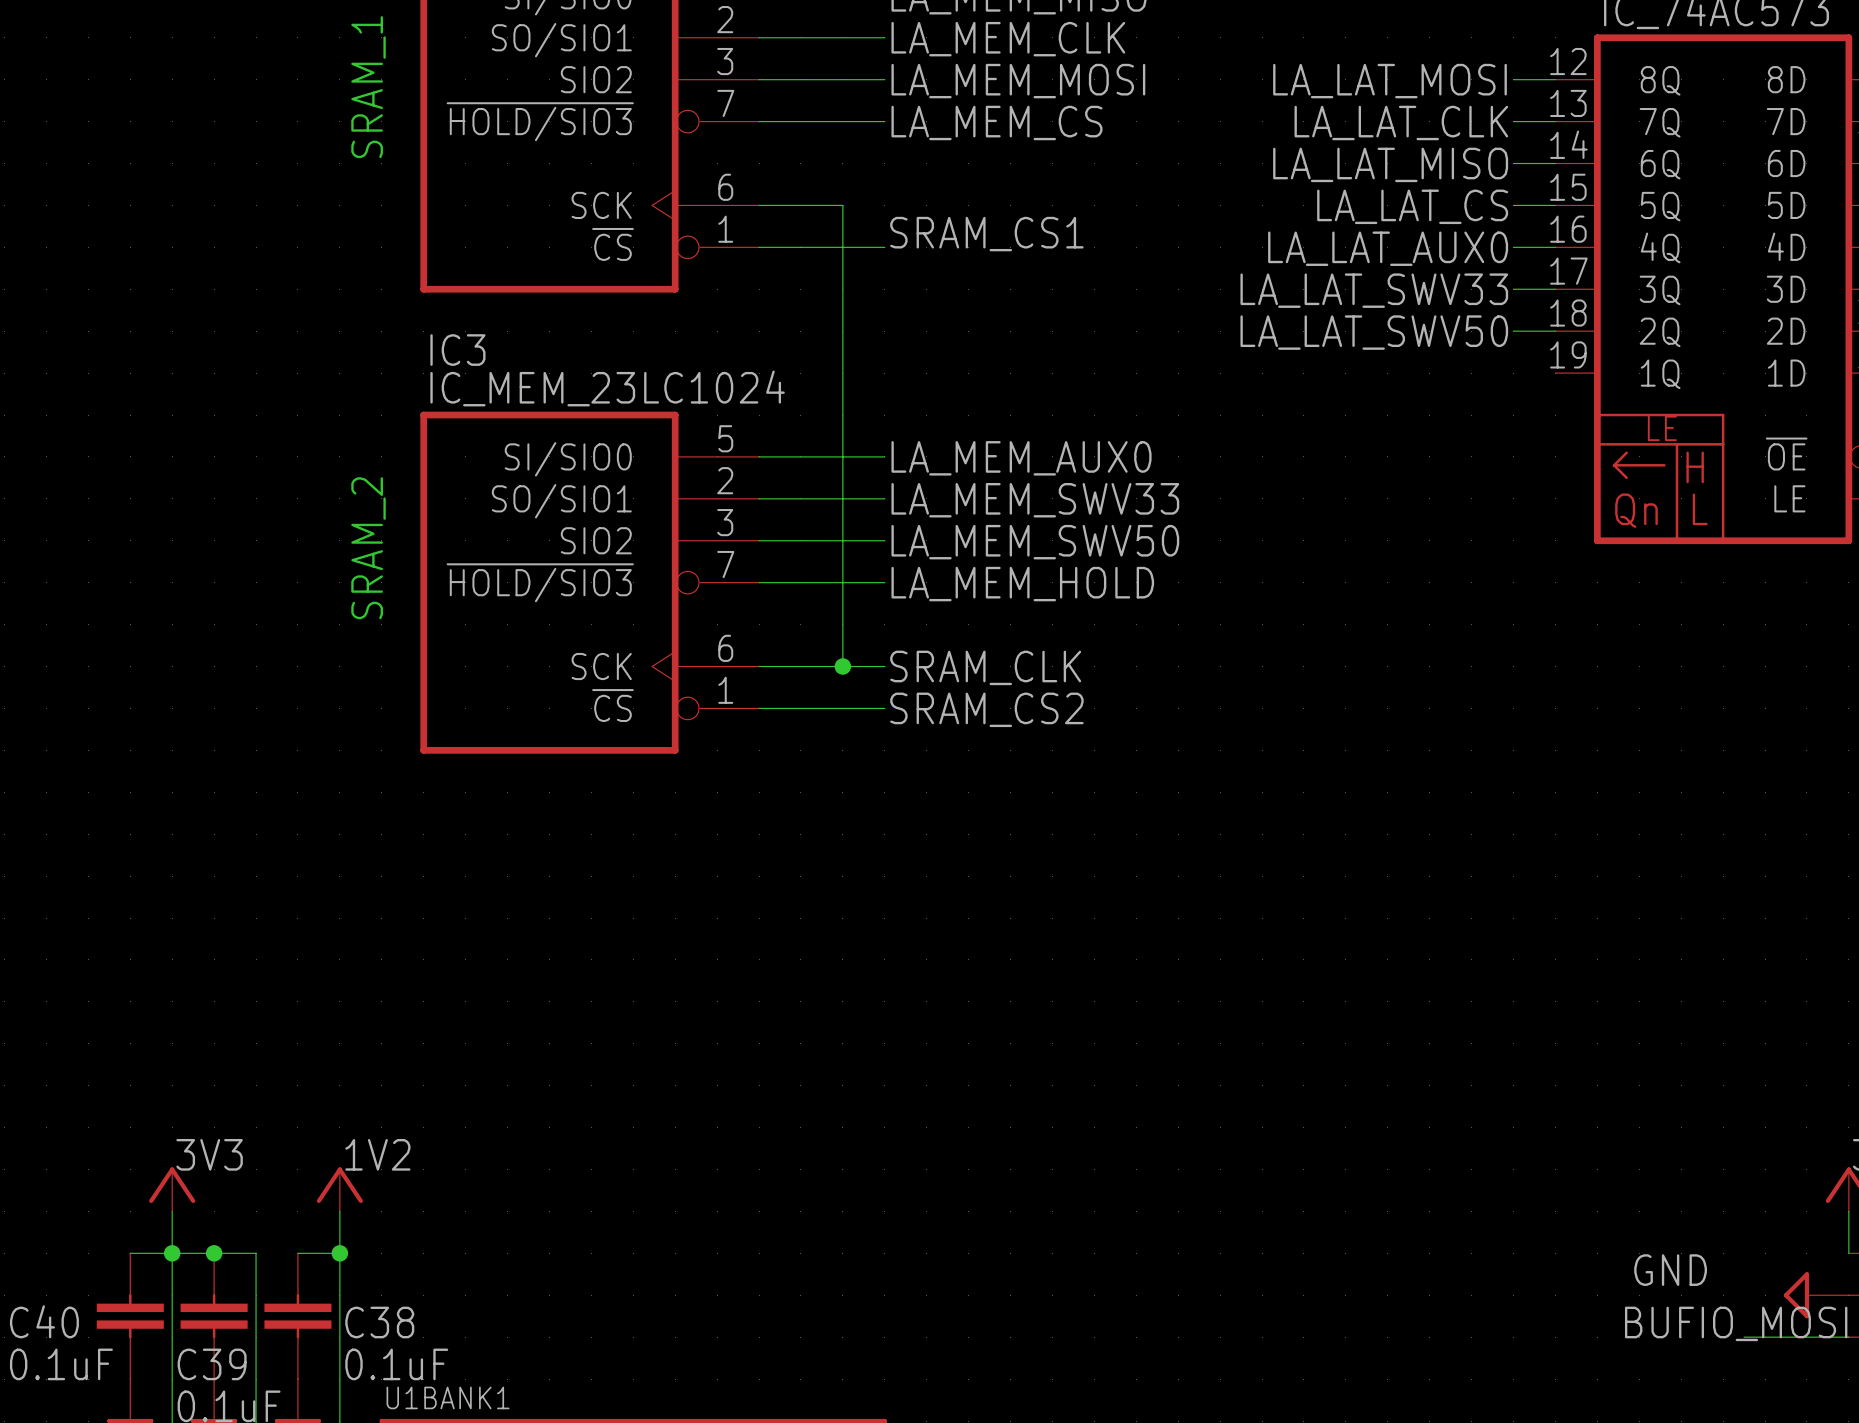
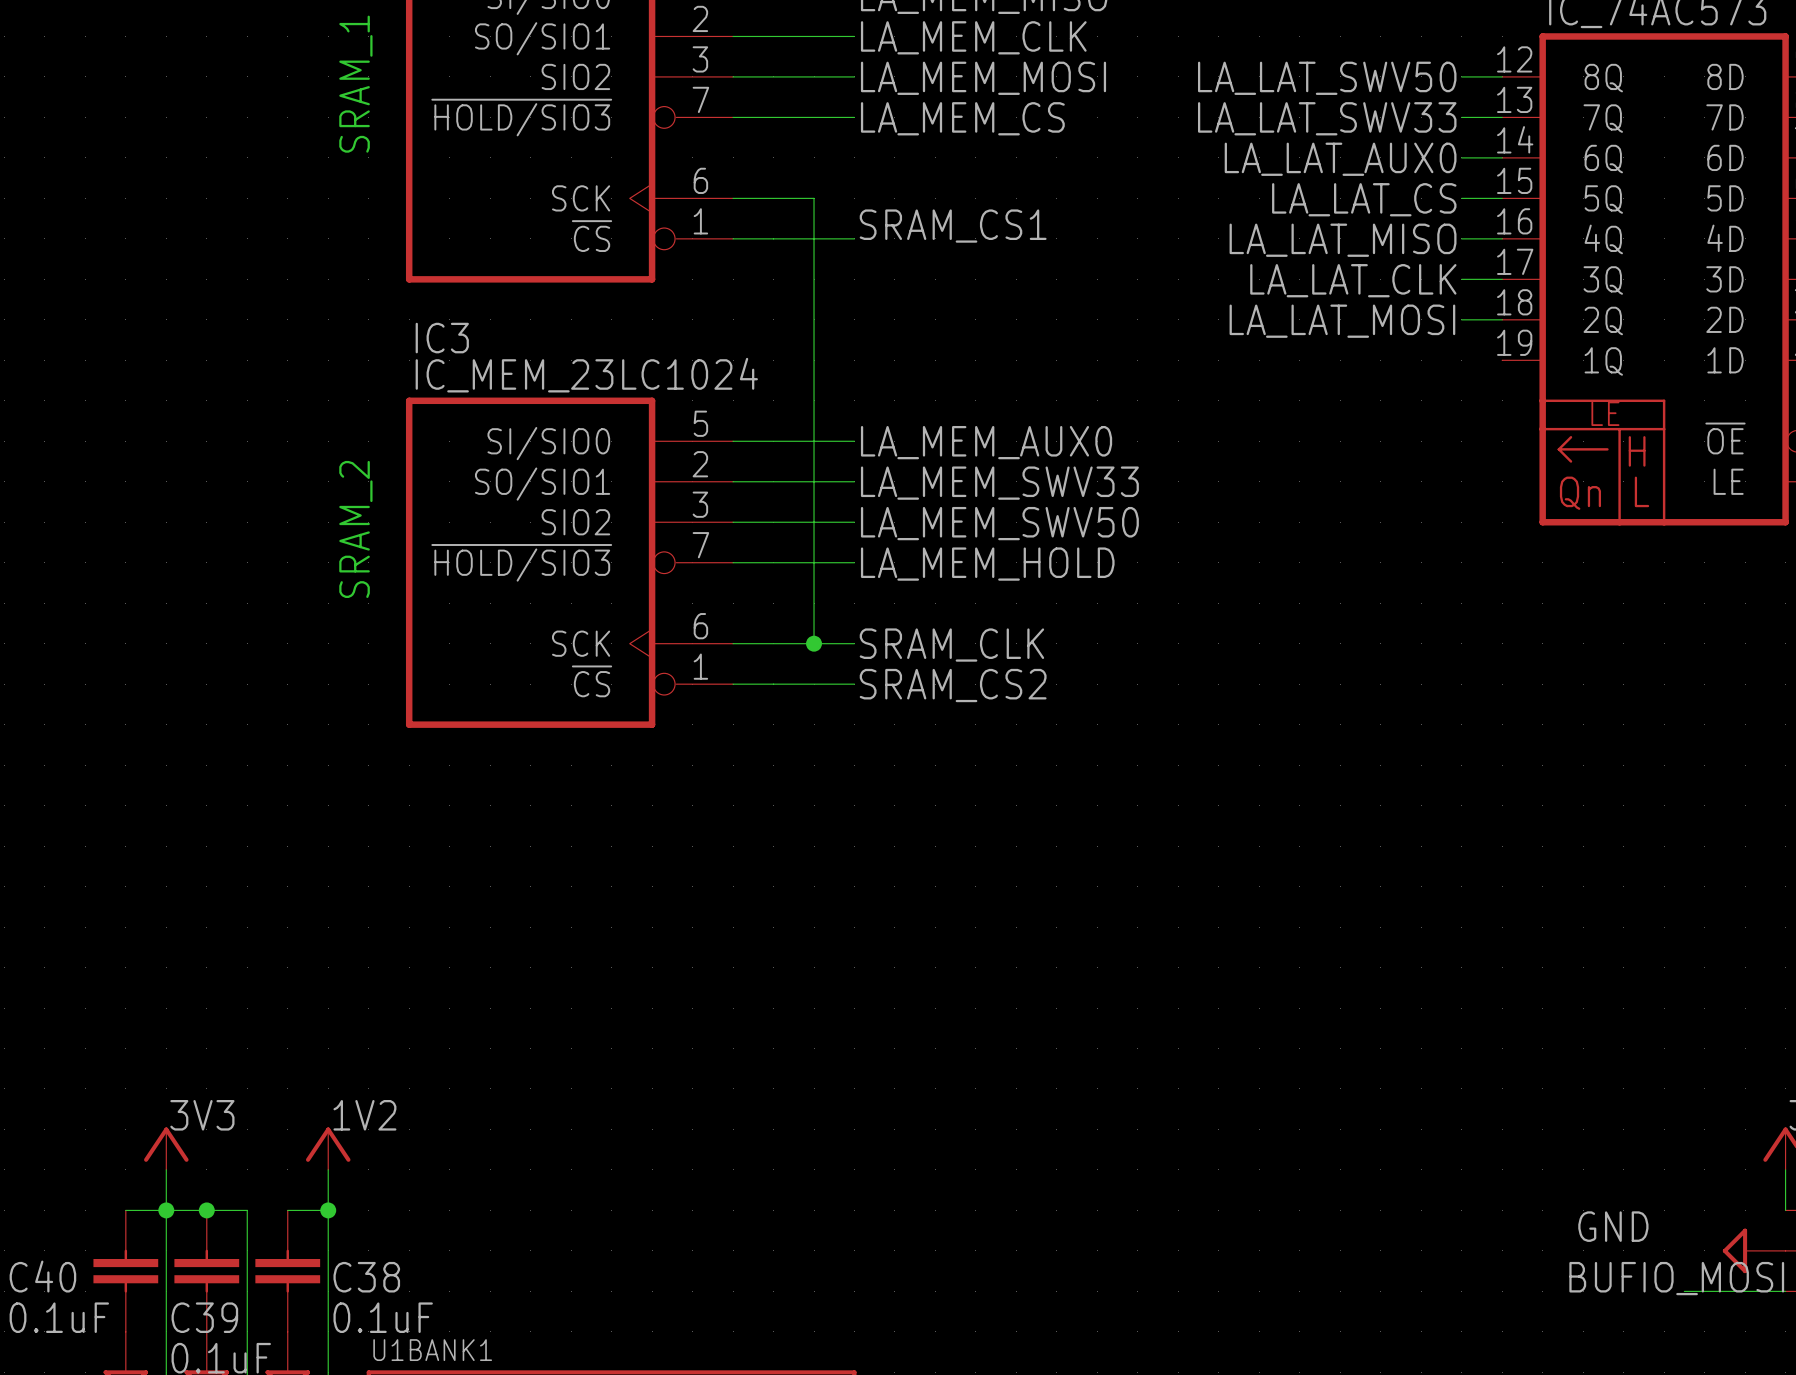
label: LA_LAT_MOSI (1390, 81) -> LA_LAT_SWV50 (1327, 78)
label: LA_LAT_CLK (1401, 122) -> LA_LAT_SWV33 (1327, 118)
label: LA_LAT_MISO (1390, 164) -> LA_LAT_AUX0 (1340, 159)
label: LA_LAT_AUX0 (1388, 248) -> LA_LAT_MISO (1343, 240)
label: LA_LAT_SWV33 (1374, 290) -> LA_LAT_CLK (1353, 280)
label: LA_LAT_SWV50 (1374, 332) -> LA_LAT_MOSI (1342, 321)

